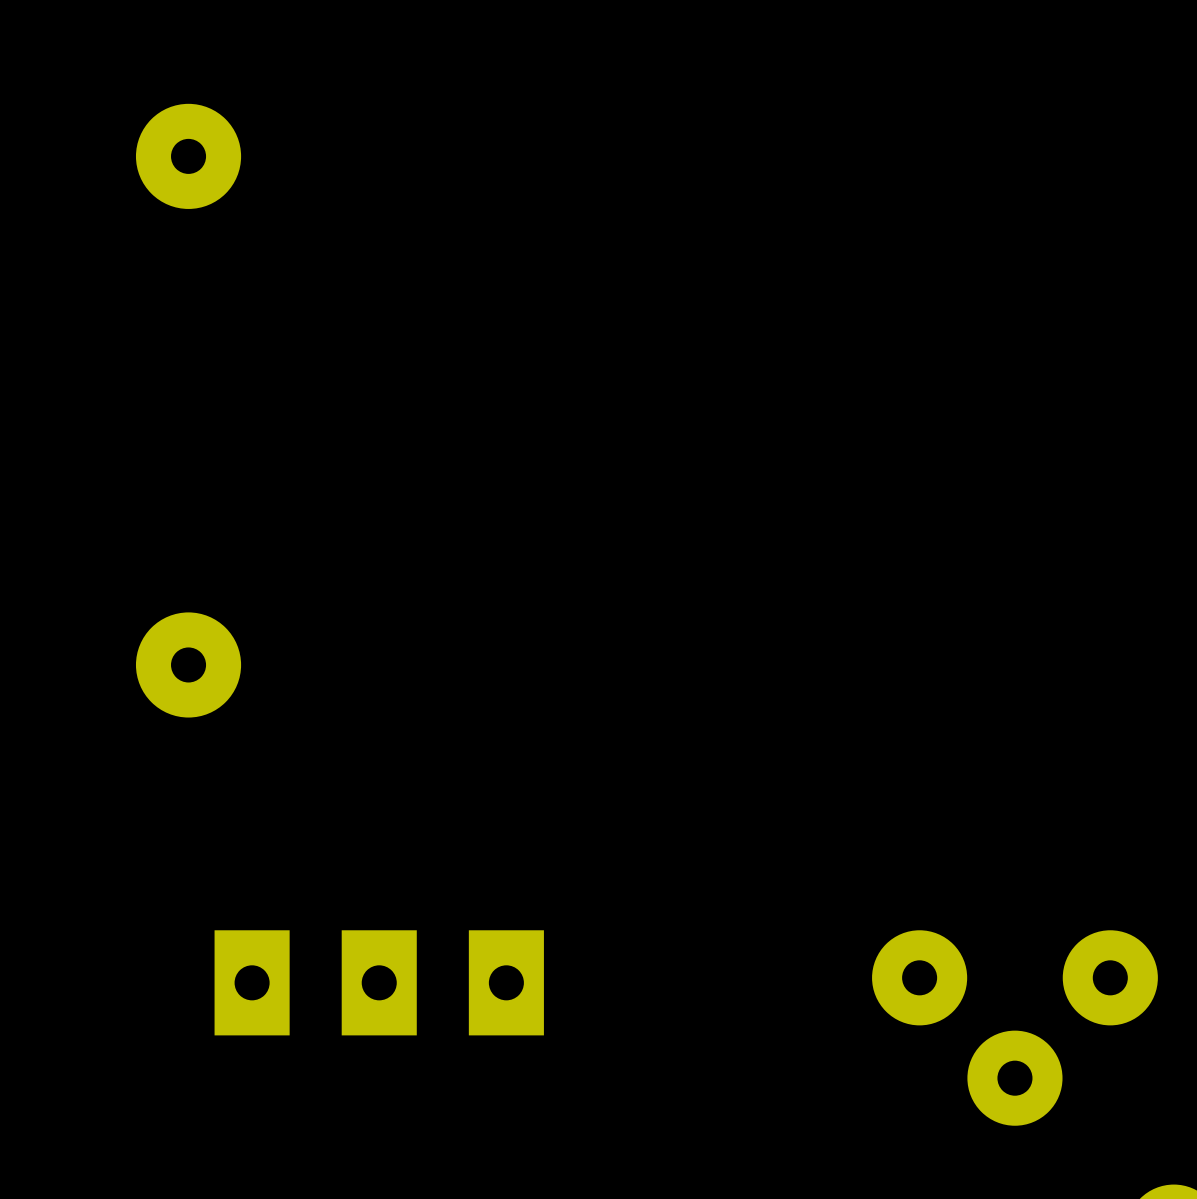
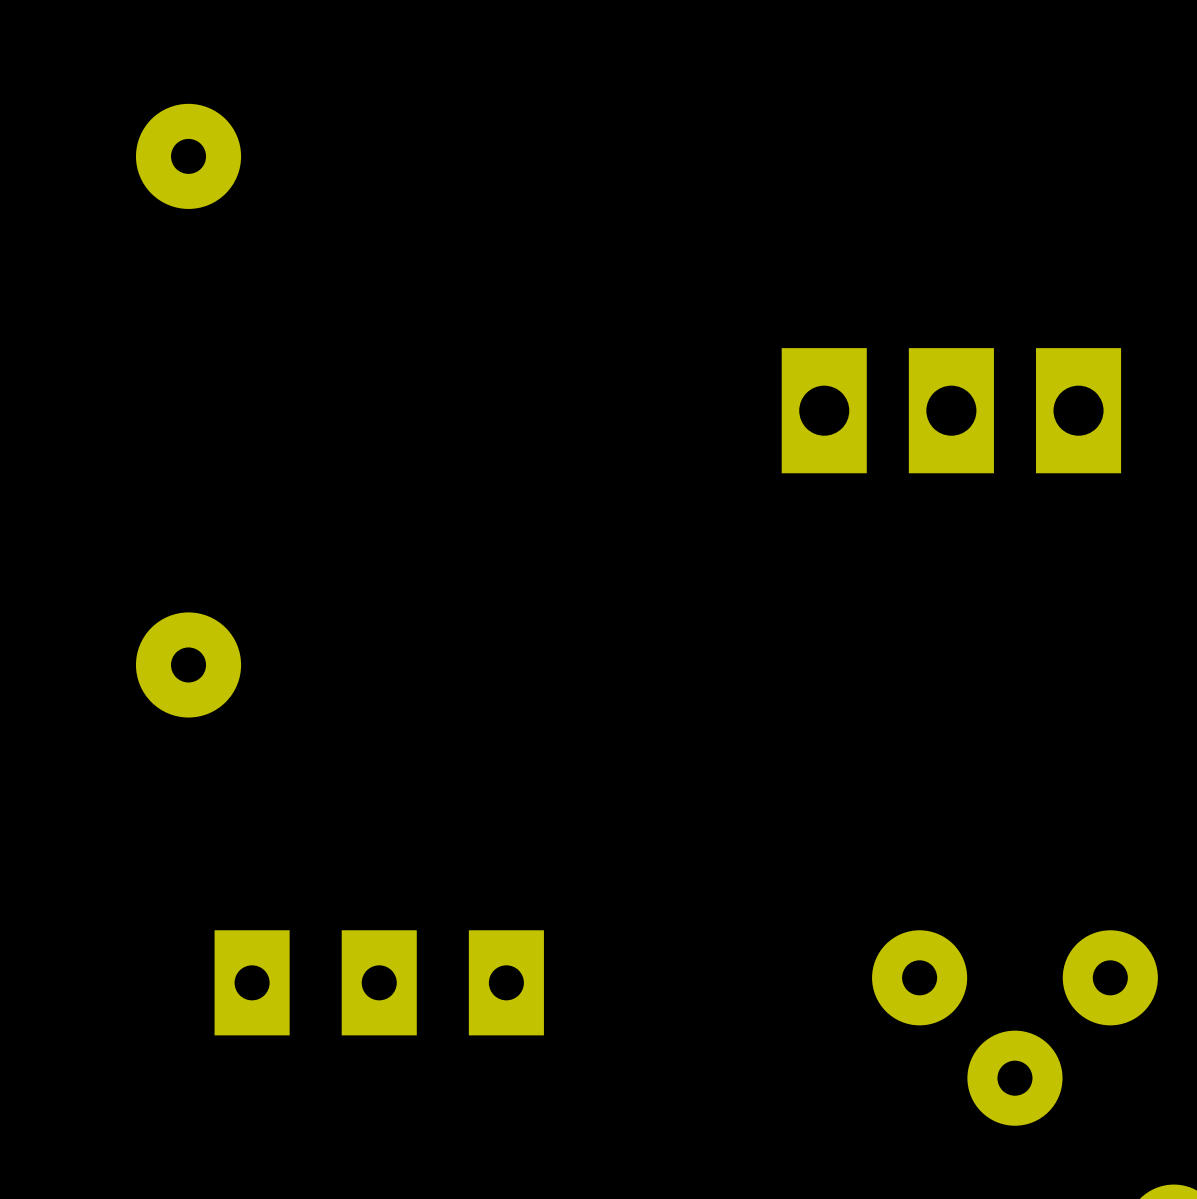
part: none -> (951, 410)

